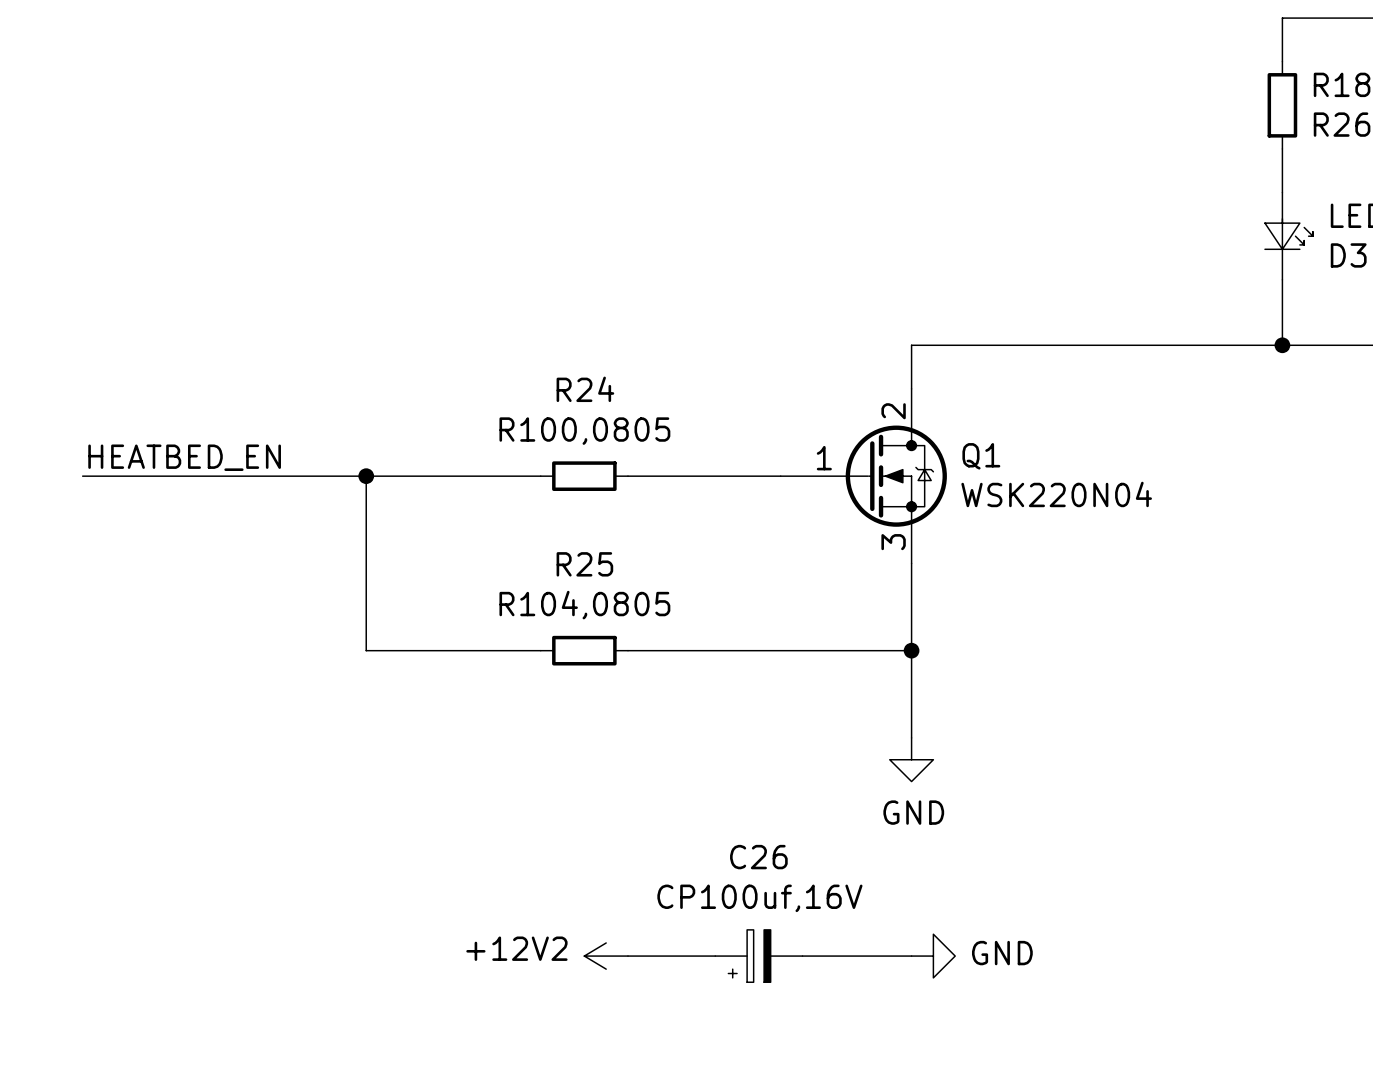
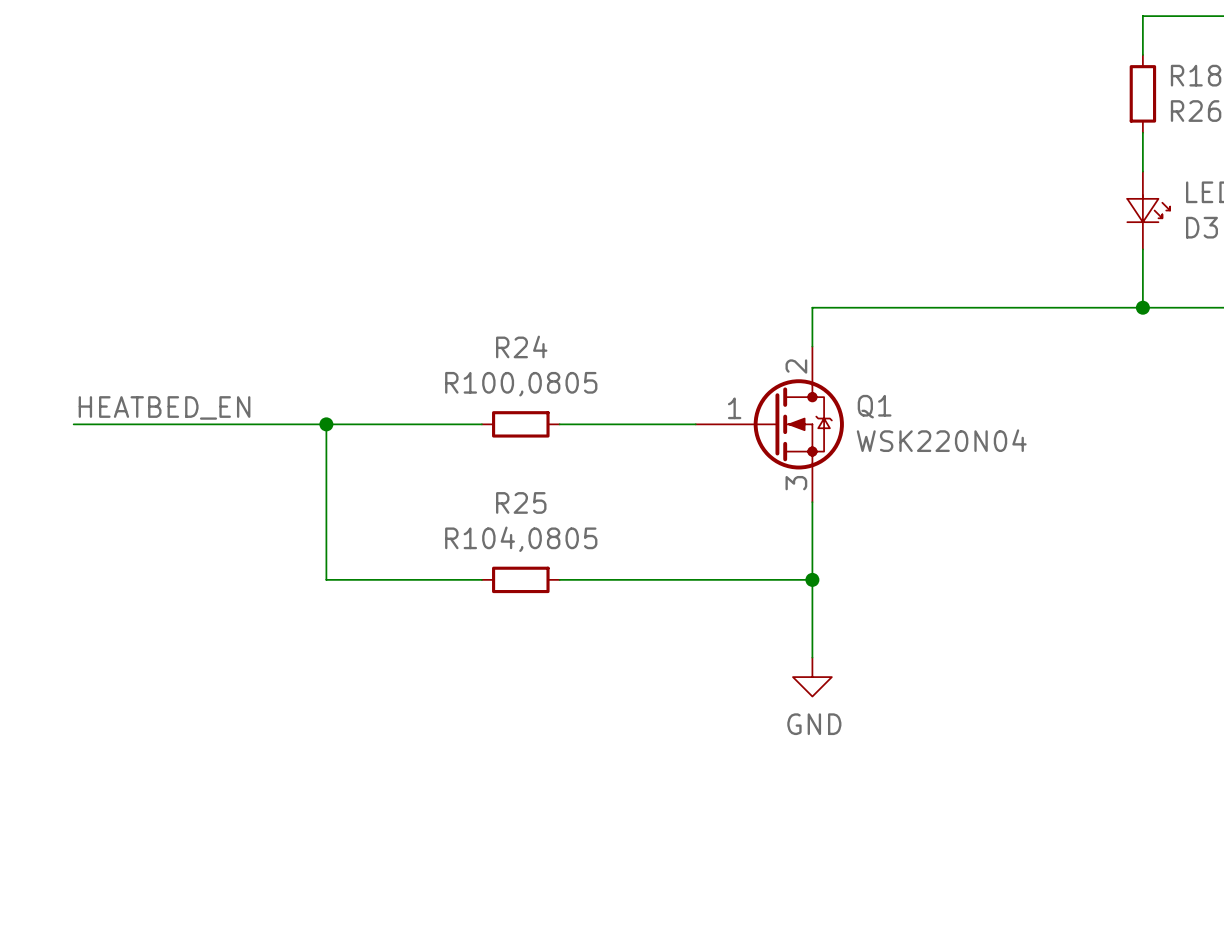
power symbol: +12V2 (606, 956) -> none
wire: (628, 956) (715, 956) -> none
C26: CP100uf,16V (758, 956) -> none
wire: (802, 956) (911, 956) -> none
power symbol: GND (933, 956) -> none

